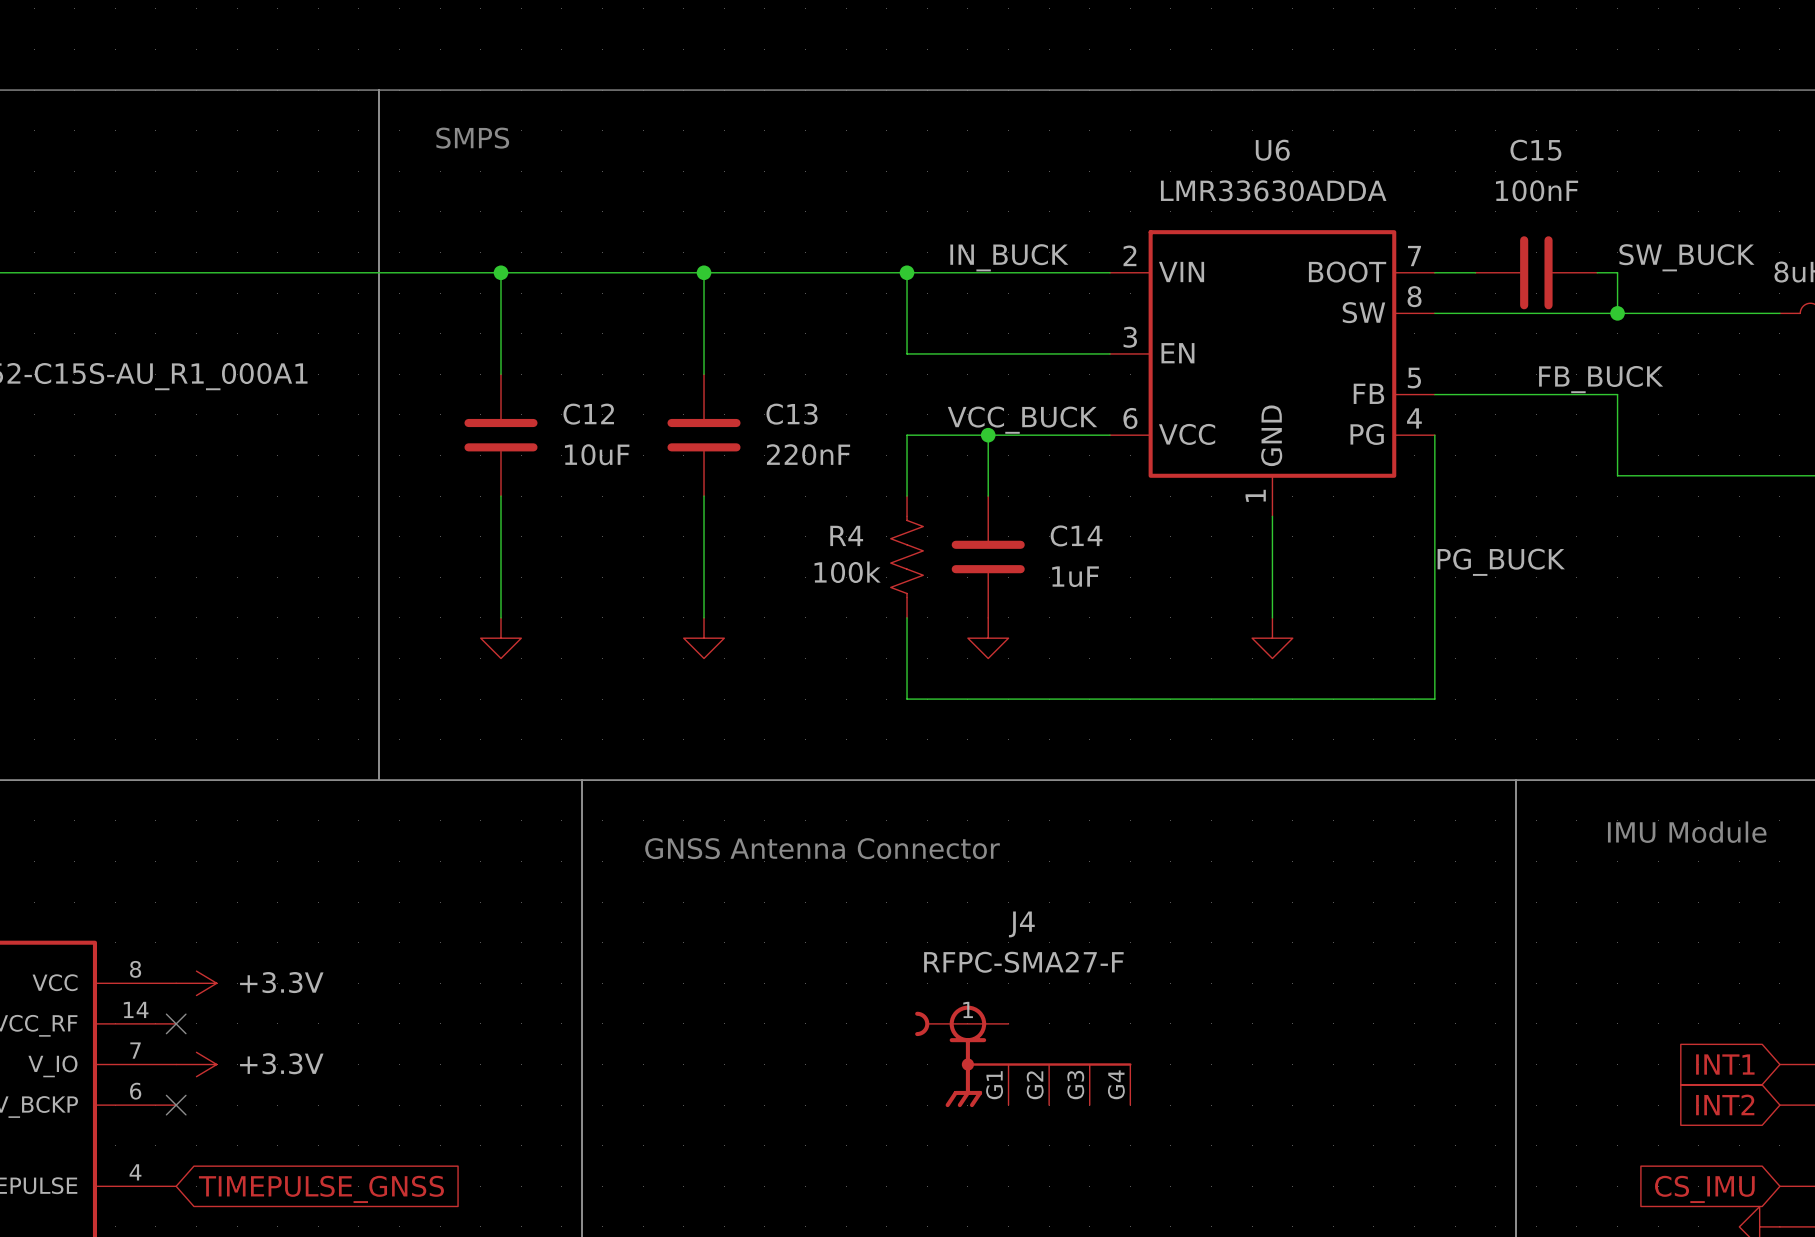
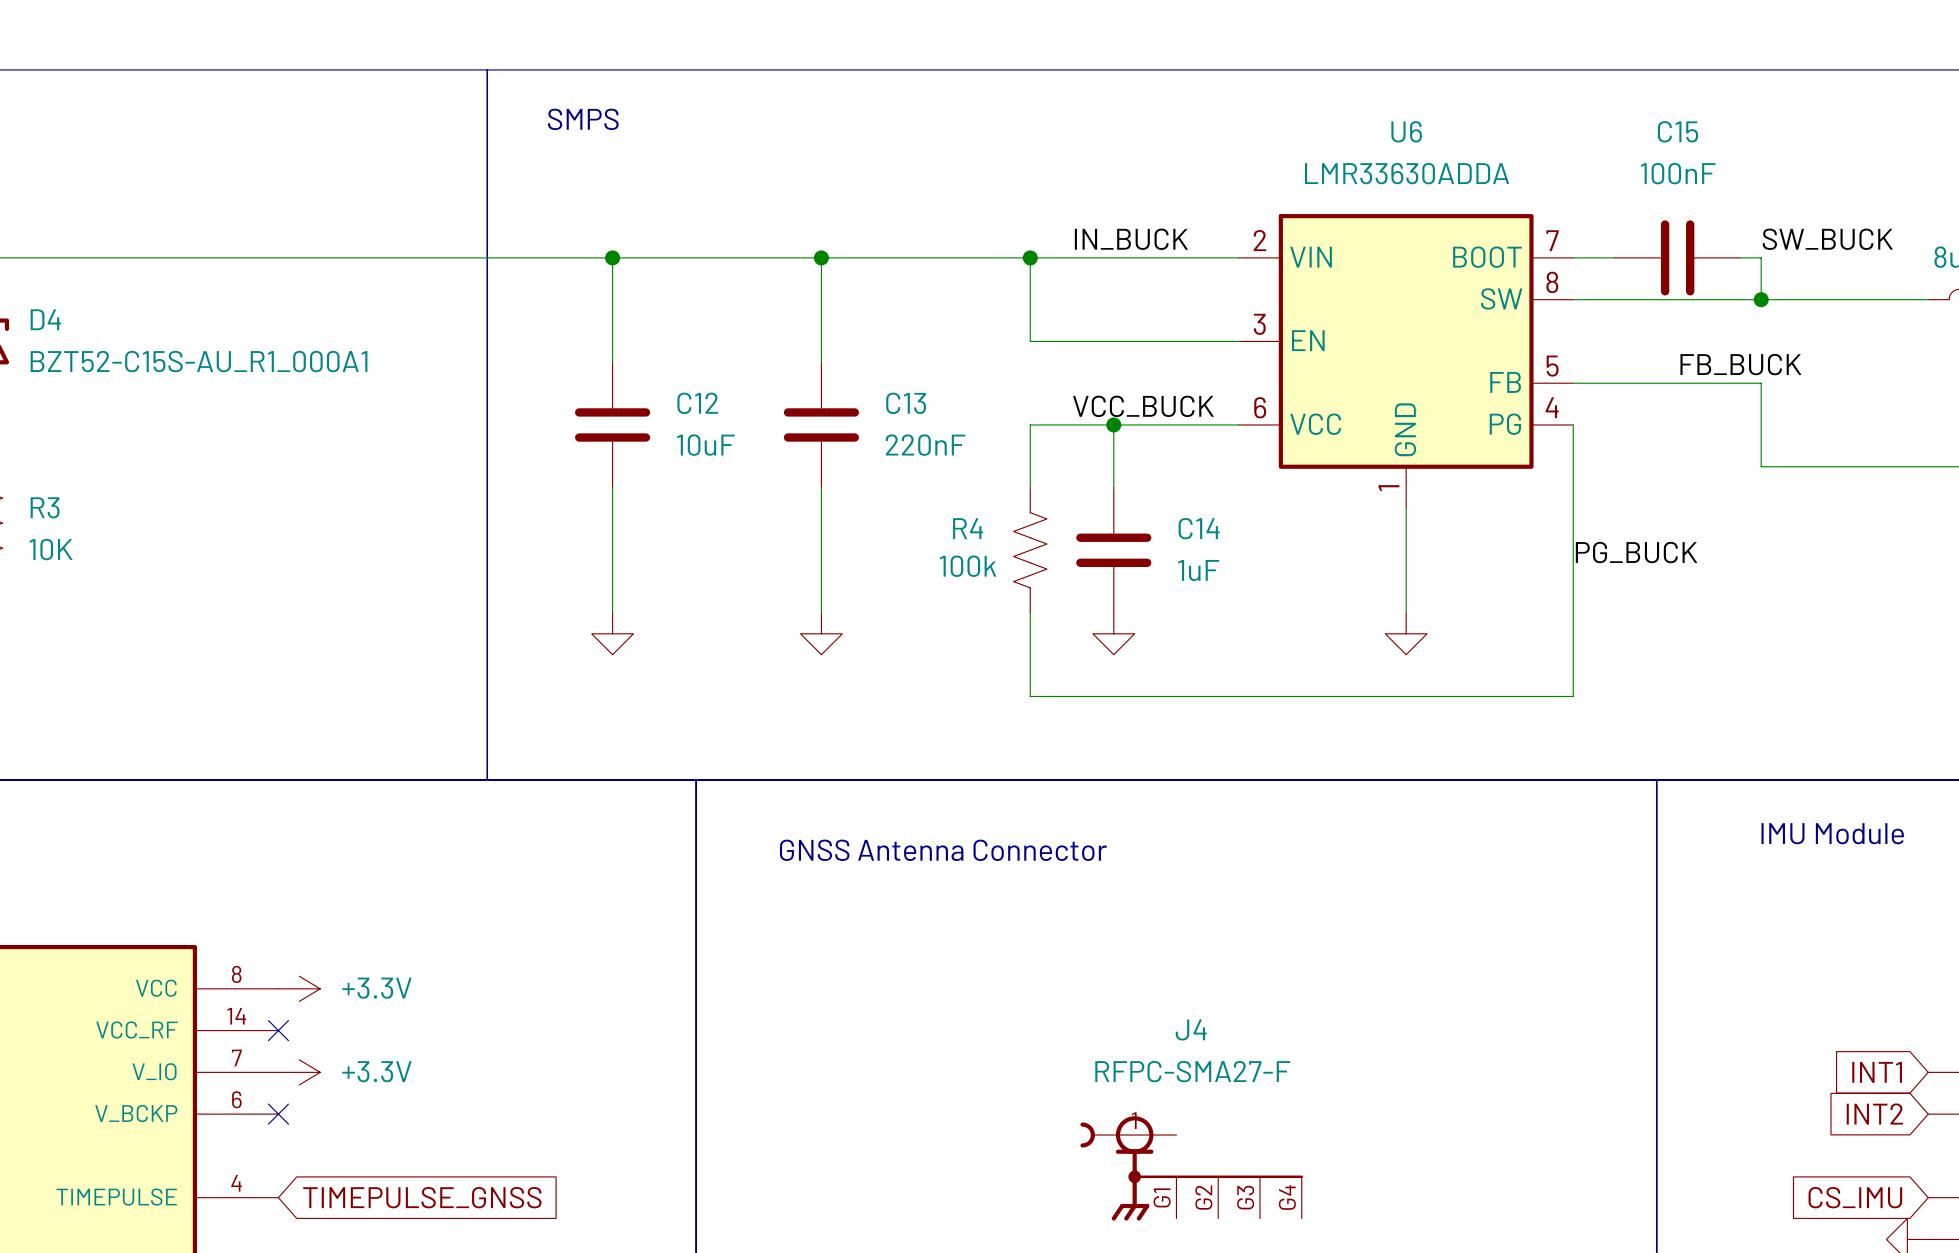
J4 position: (1023, 1056) -> (1191, 1168)

